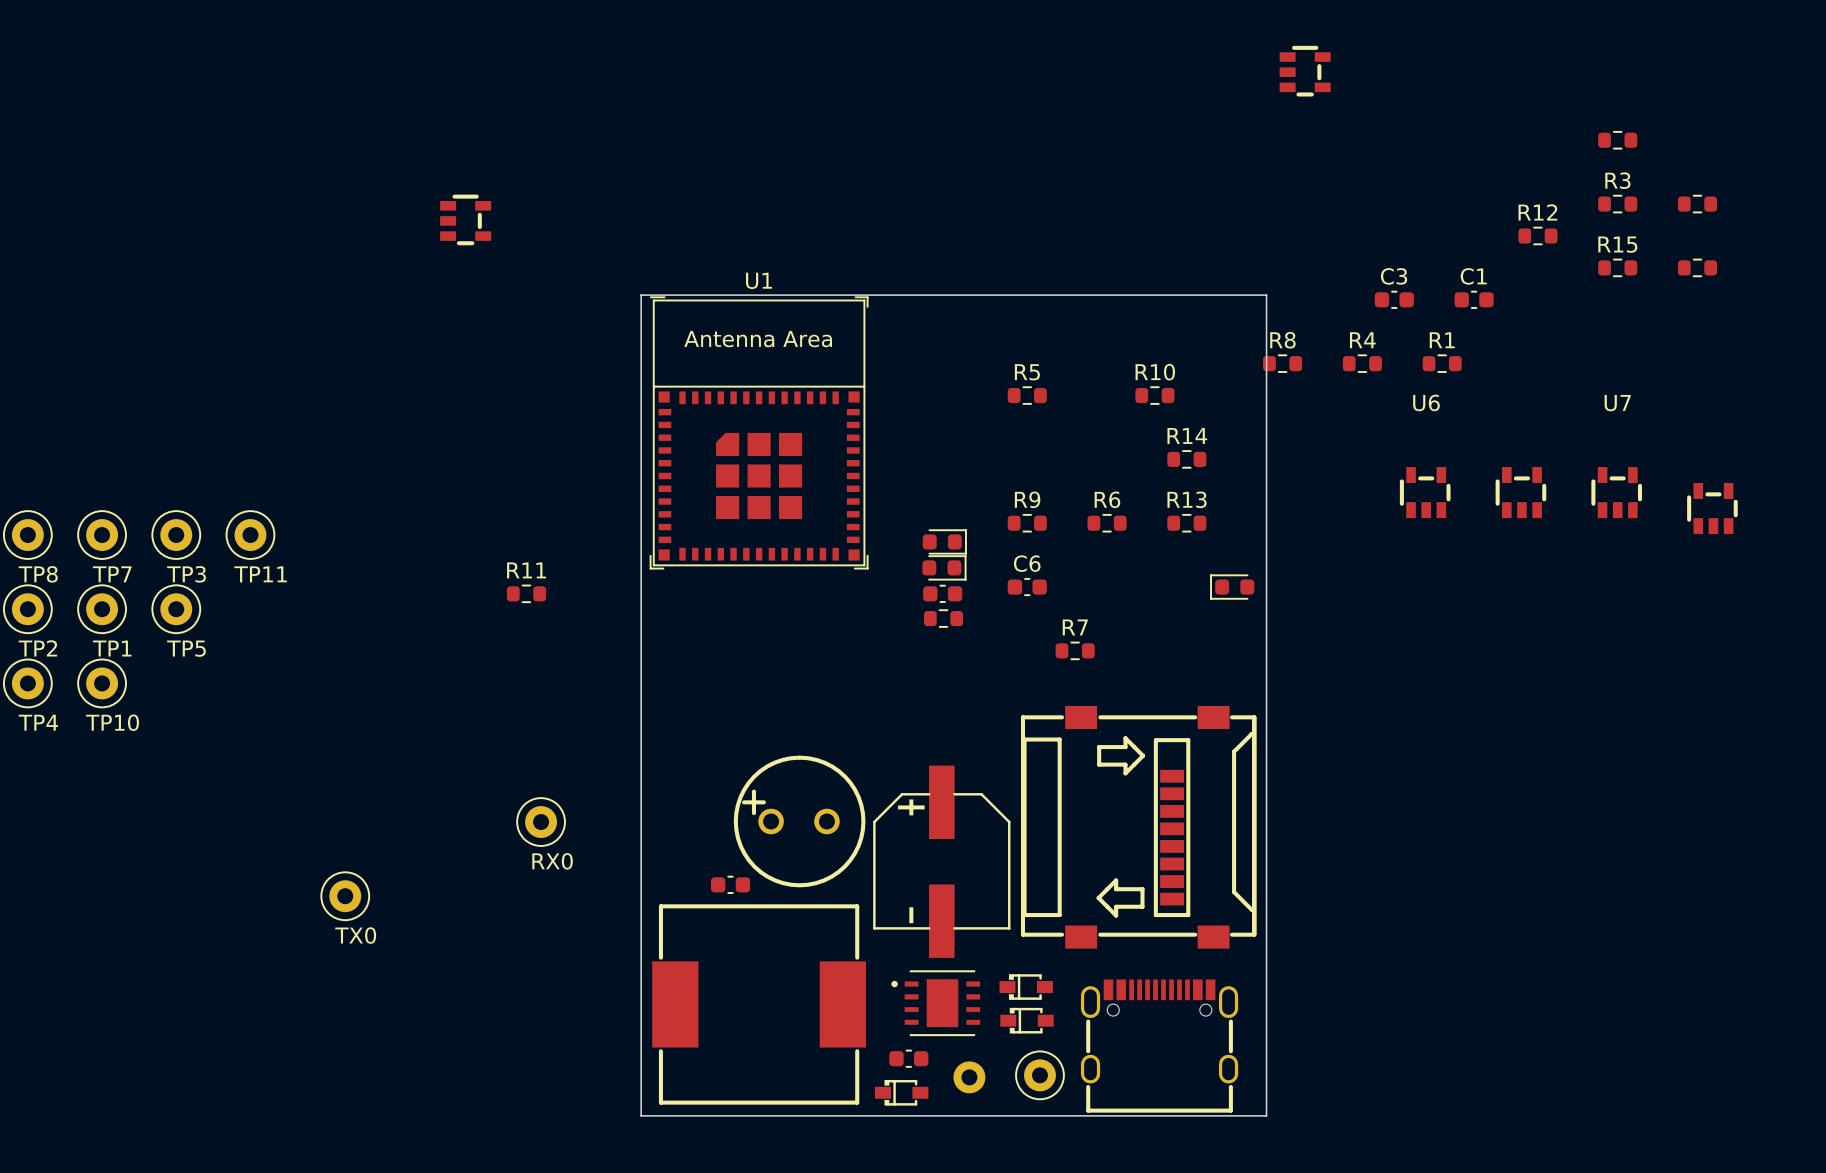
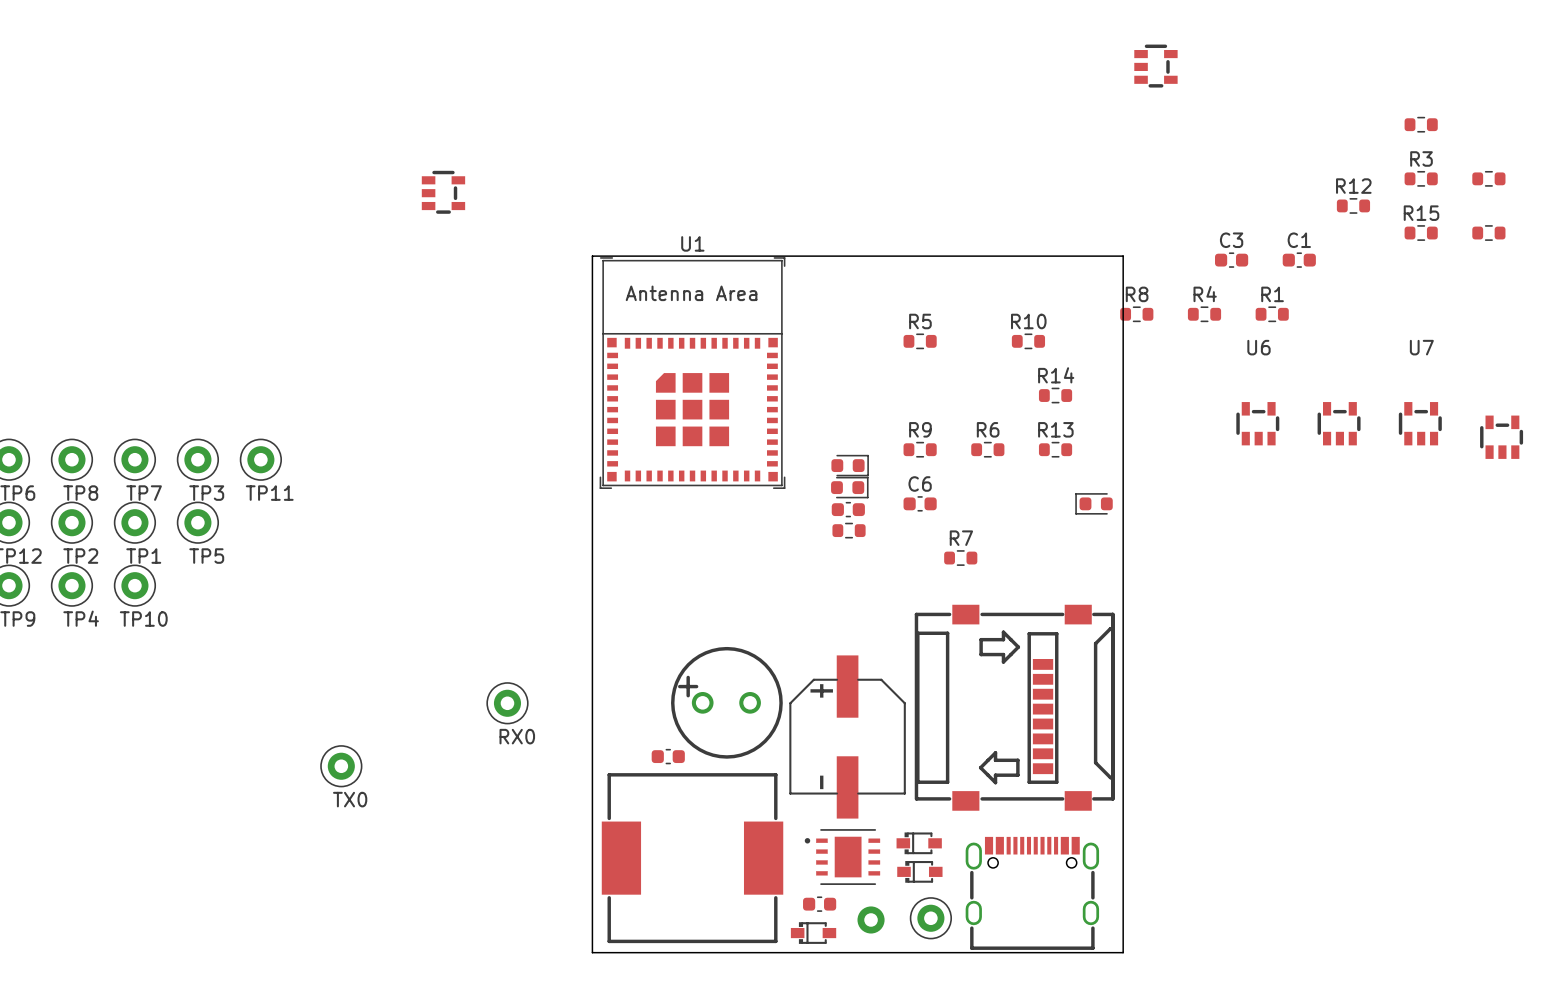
R11: (526, 593) -> none

